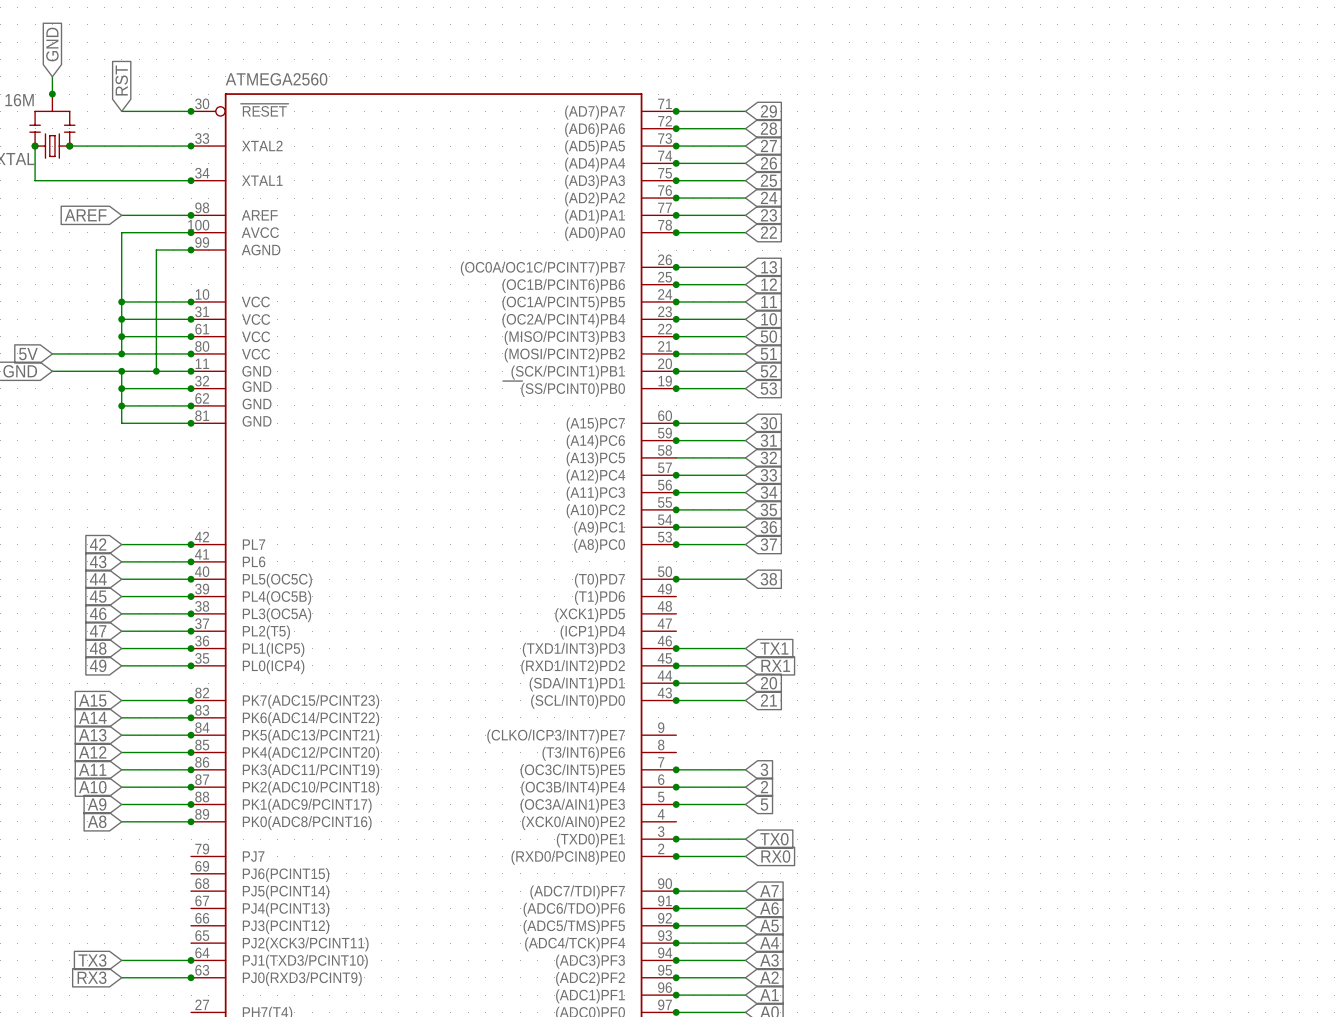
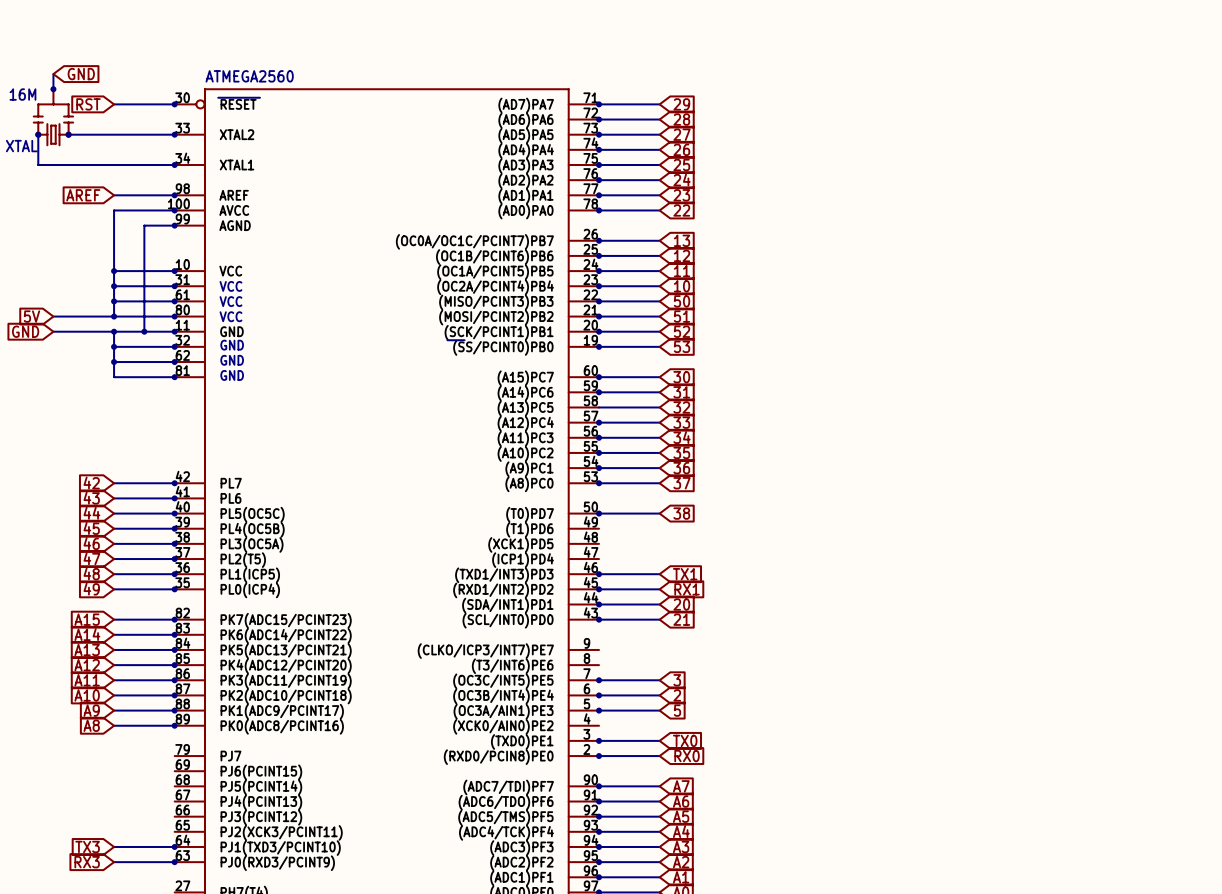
global label rotation: 0° (52, 44) -> 90° clockwise (81, 74)
global label rotation: 0° (121, 80) -> 90° counterclockwise (88, 104)

